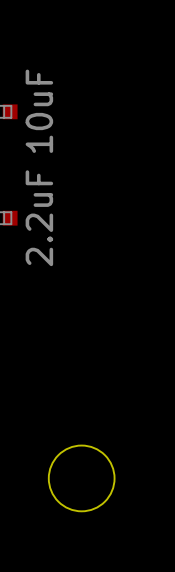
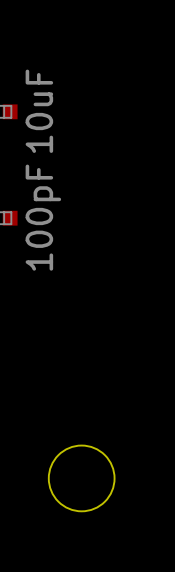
part value: 2.2uF (39, 218) -> 100pF (43, 217)

